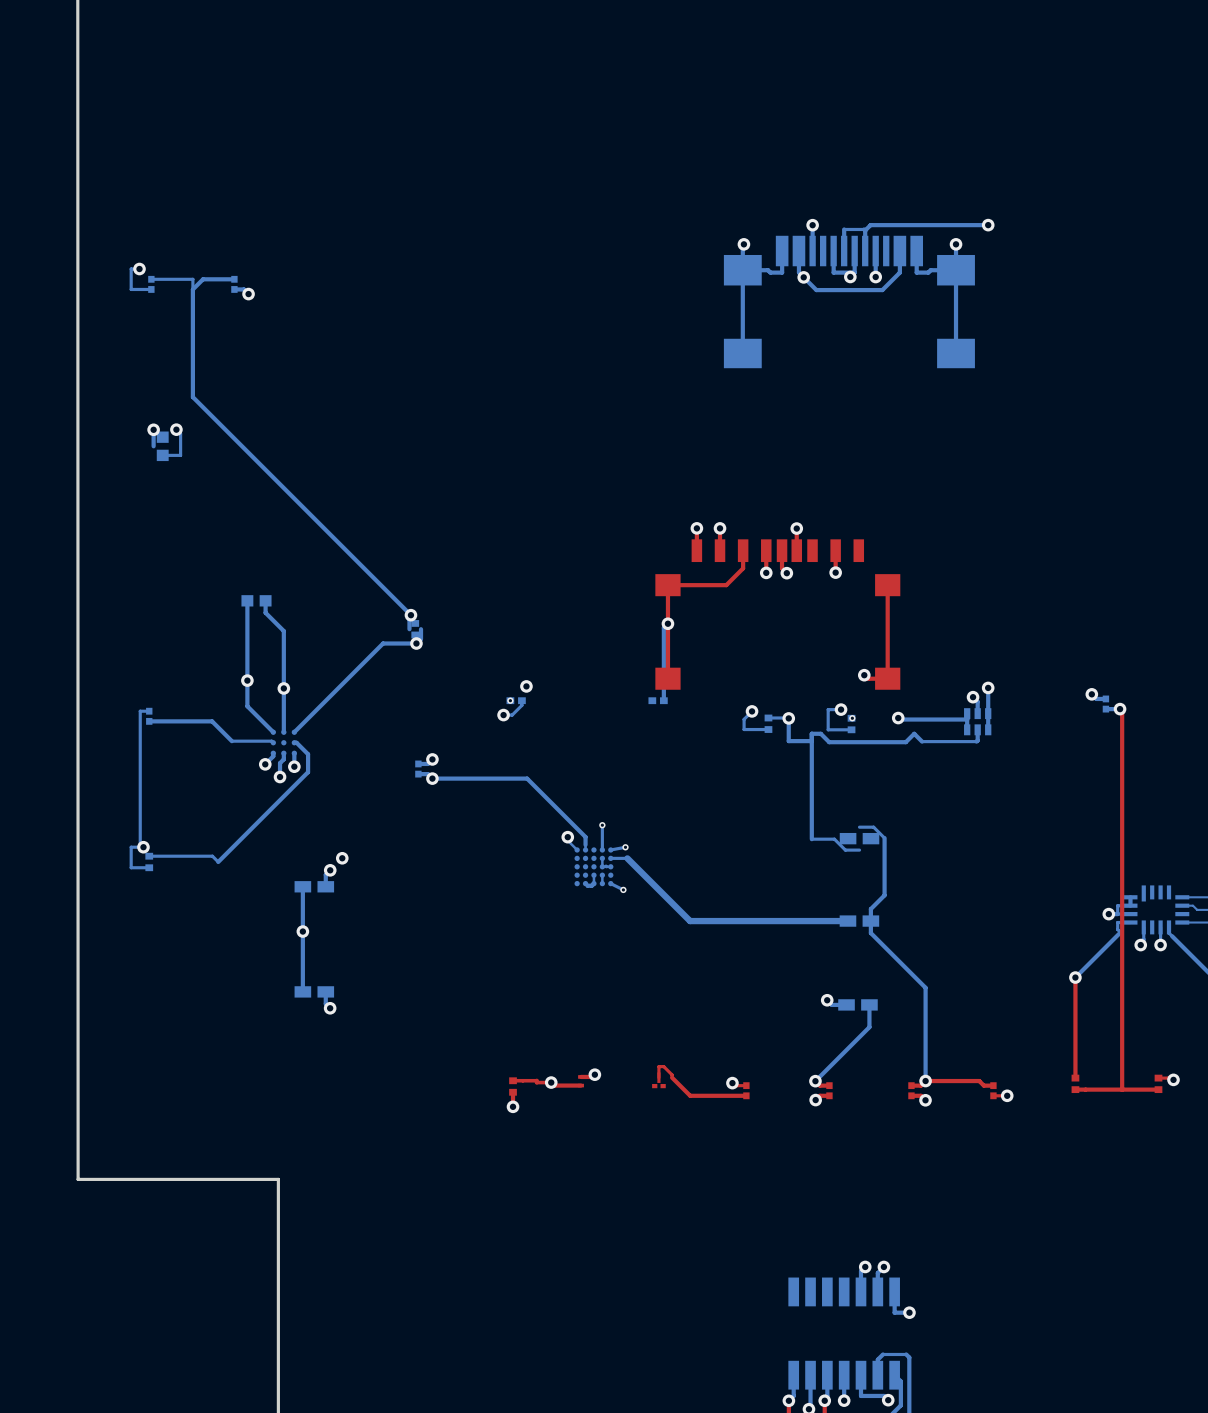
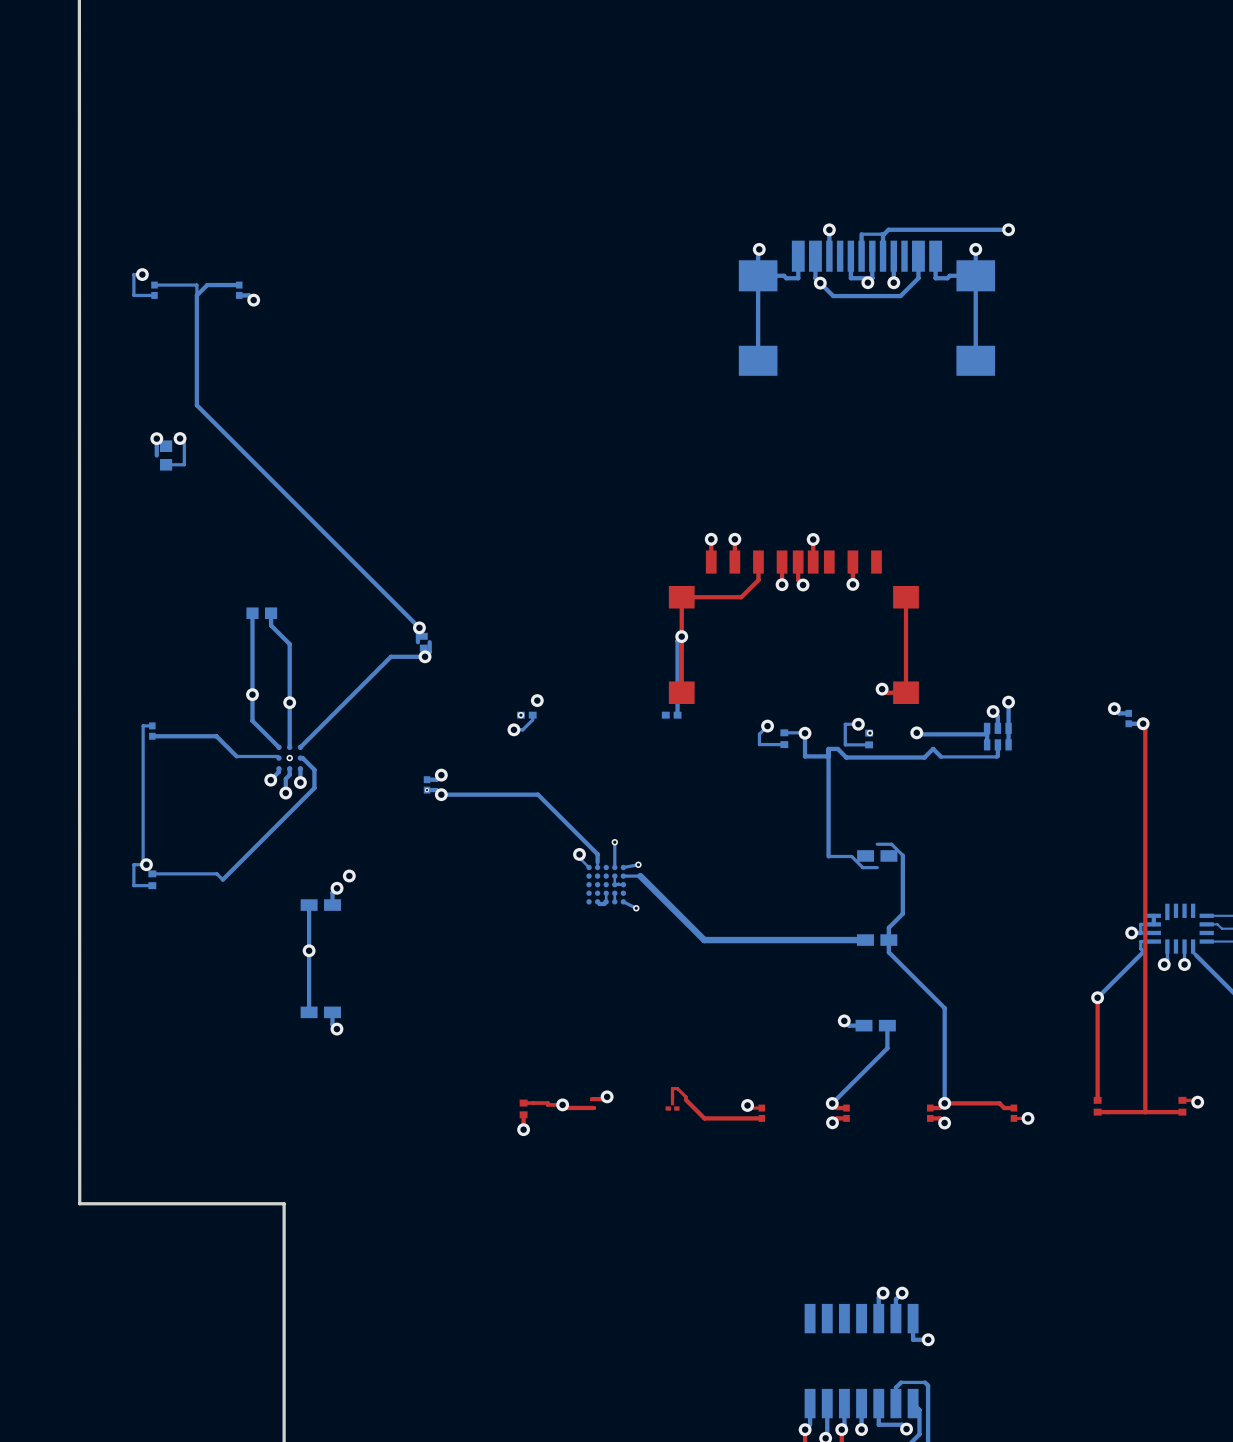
via: none -> (289, 758)
via: none -> (427, 790)

